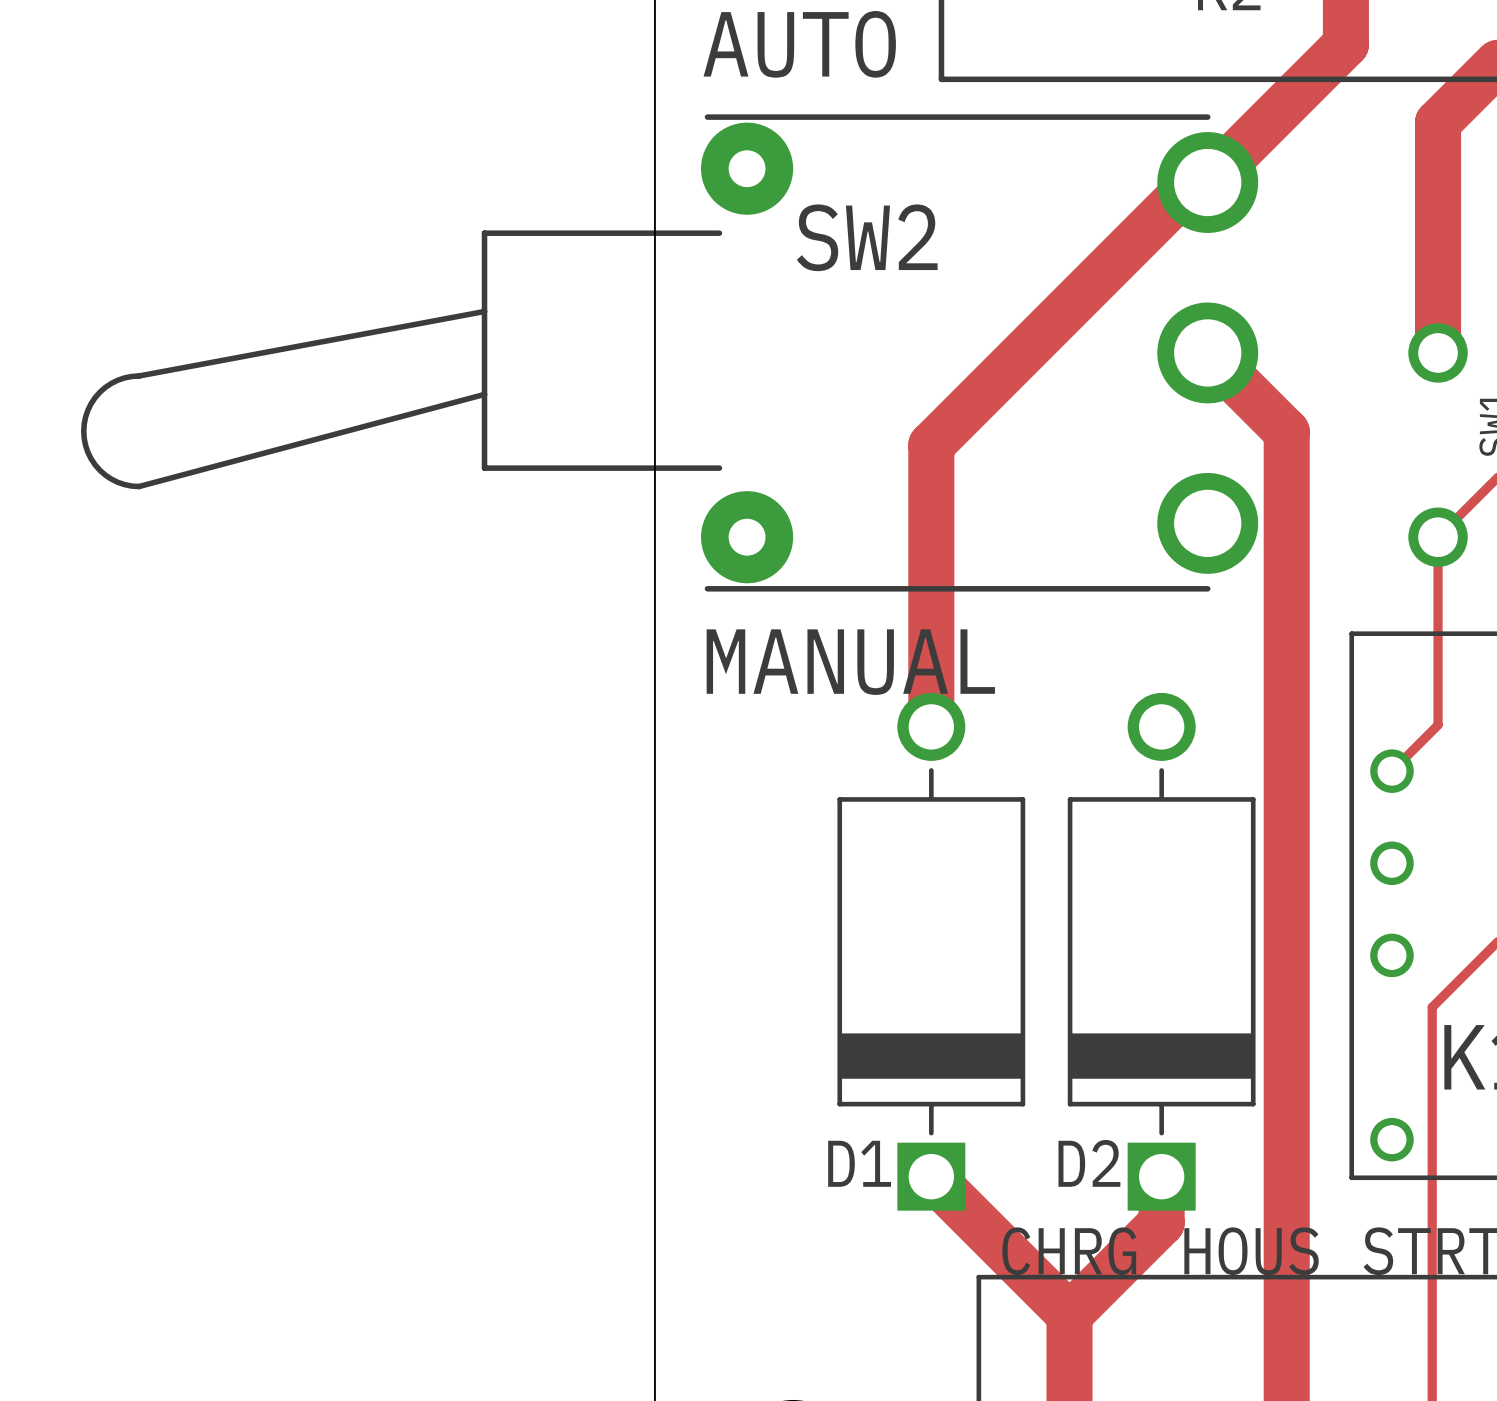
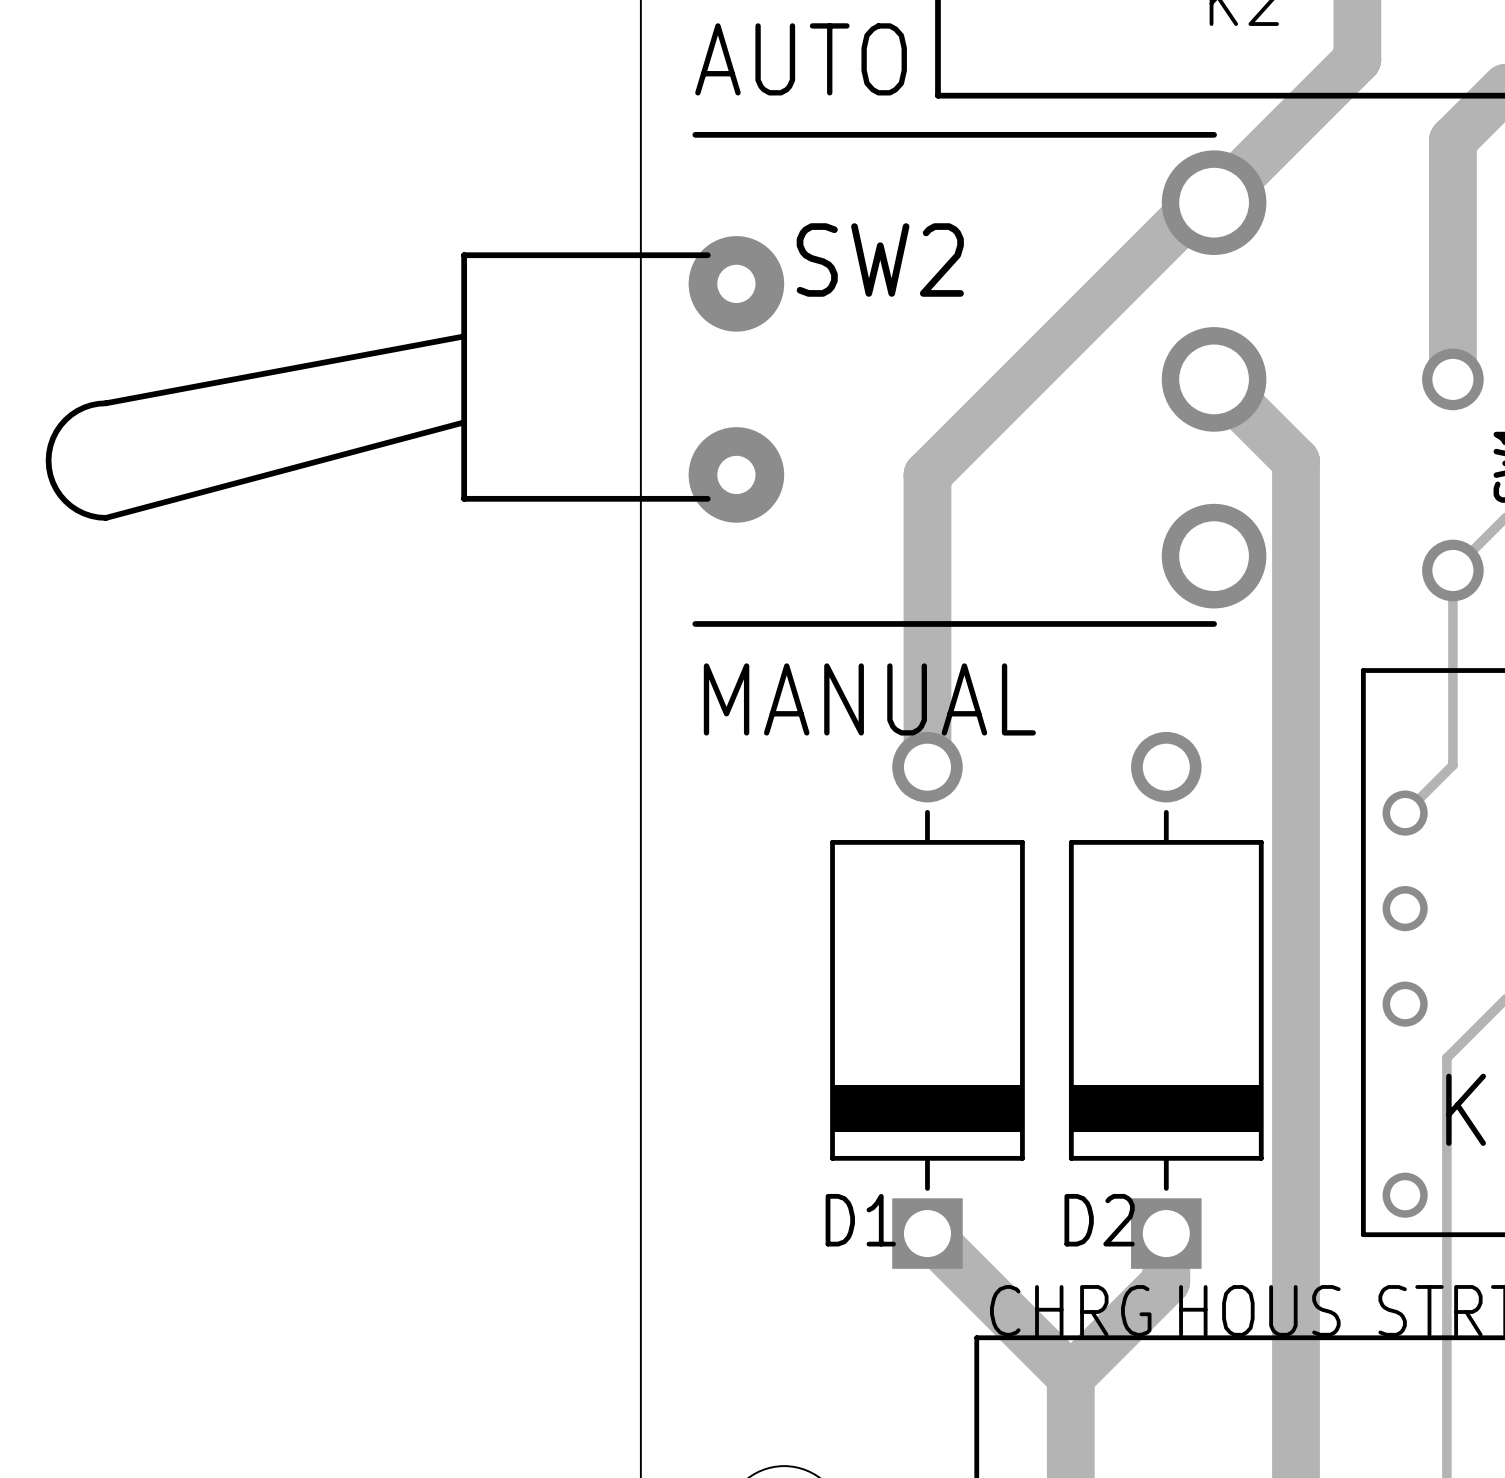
SW2 footprint: [80, 114, 1259, 592] -> [45, 131, 1267, 627]

